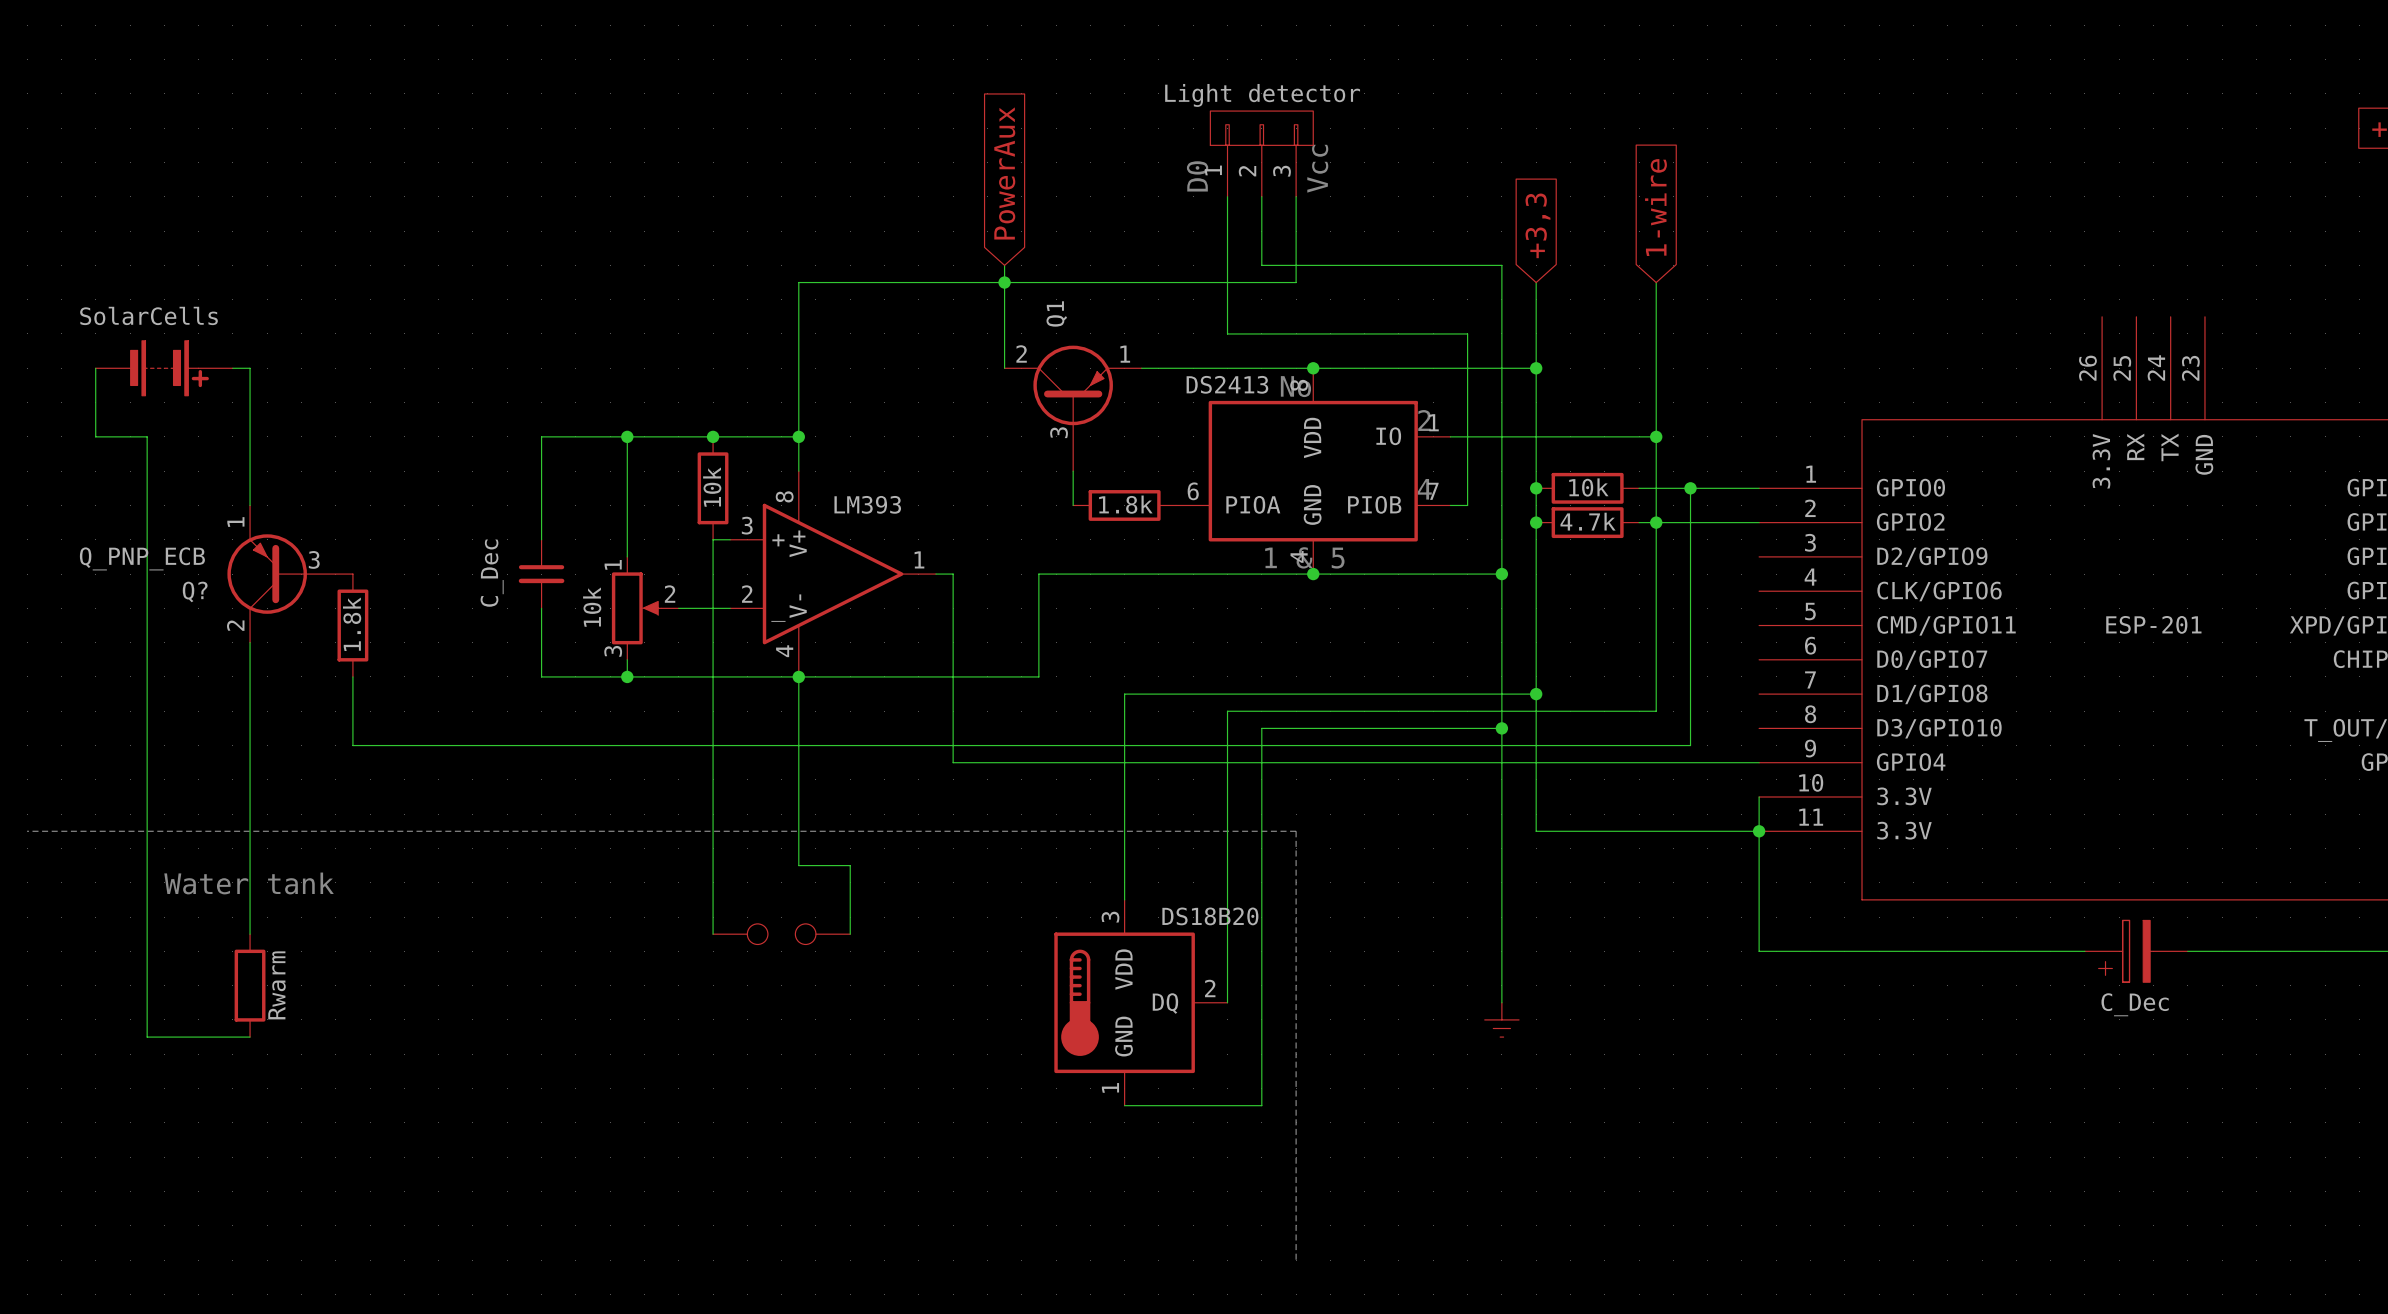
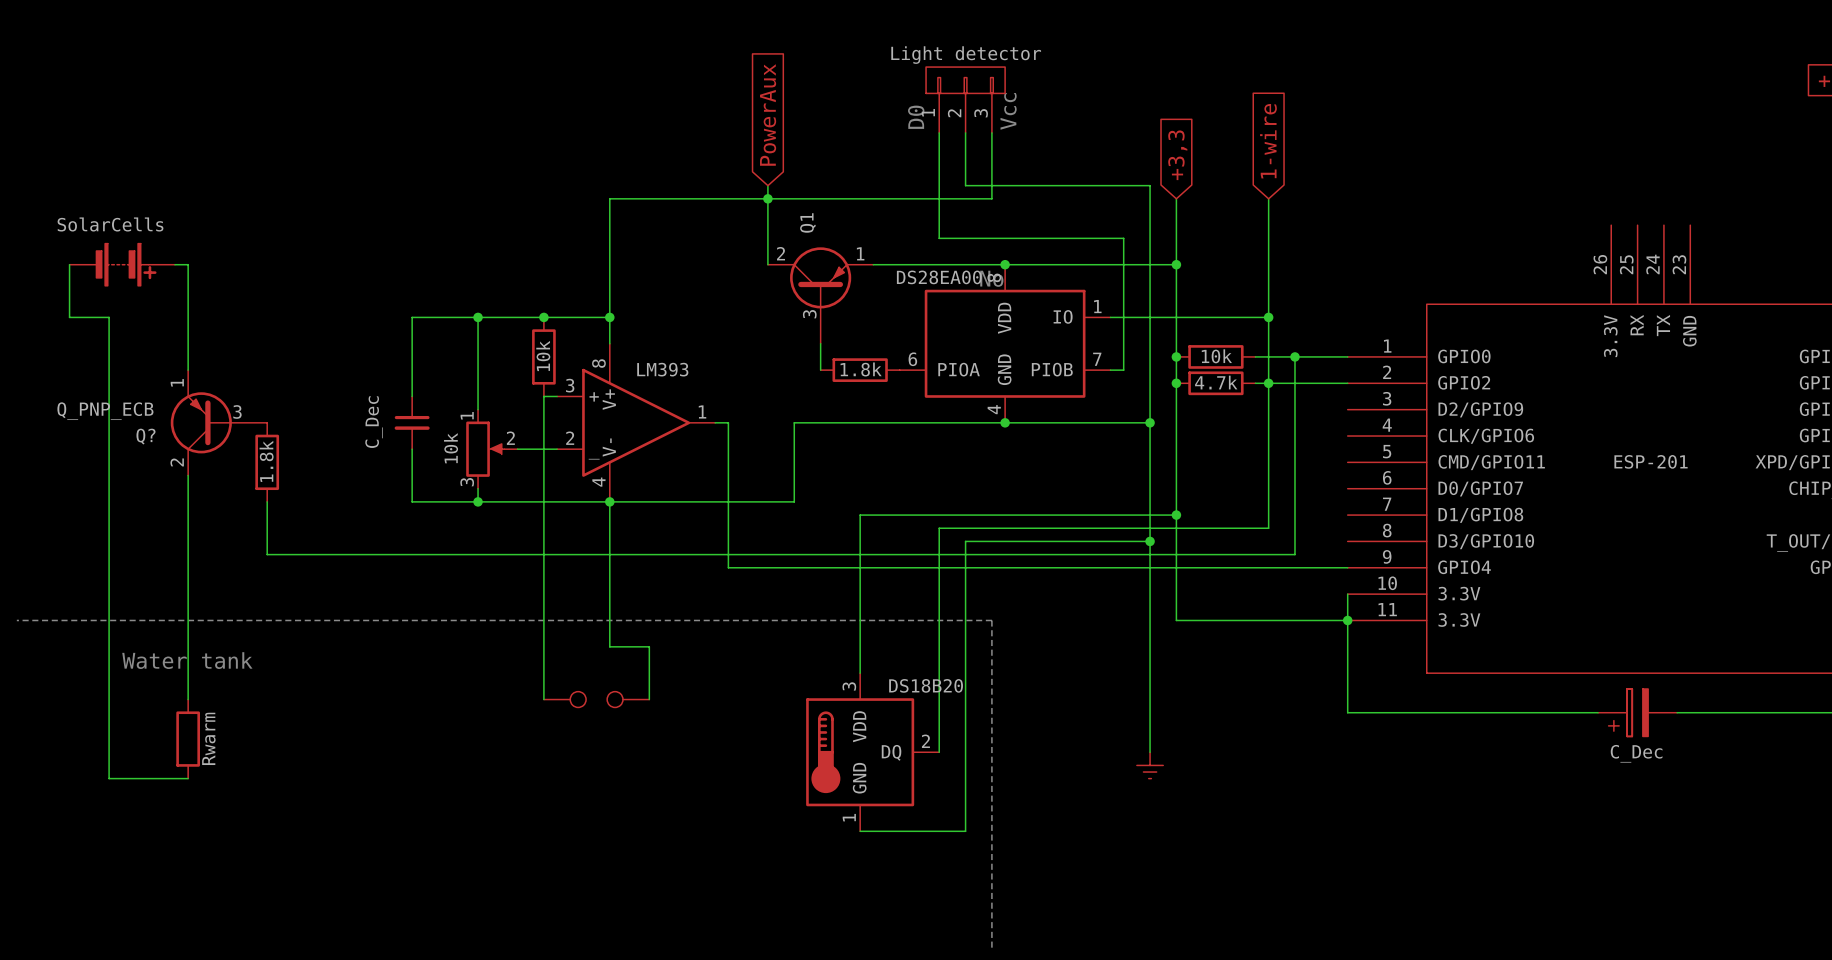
part value: DS2413 (1227, 384) -> DS28EA00 (939, 277)
text: 2 (1424, 420) -> none
text: 4 (1424, 489) -> none
text: 1 & 5 (1304, 557) -> none

